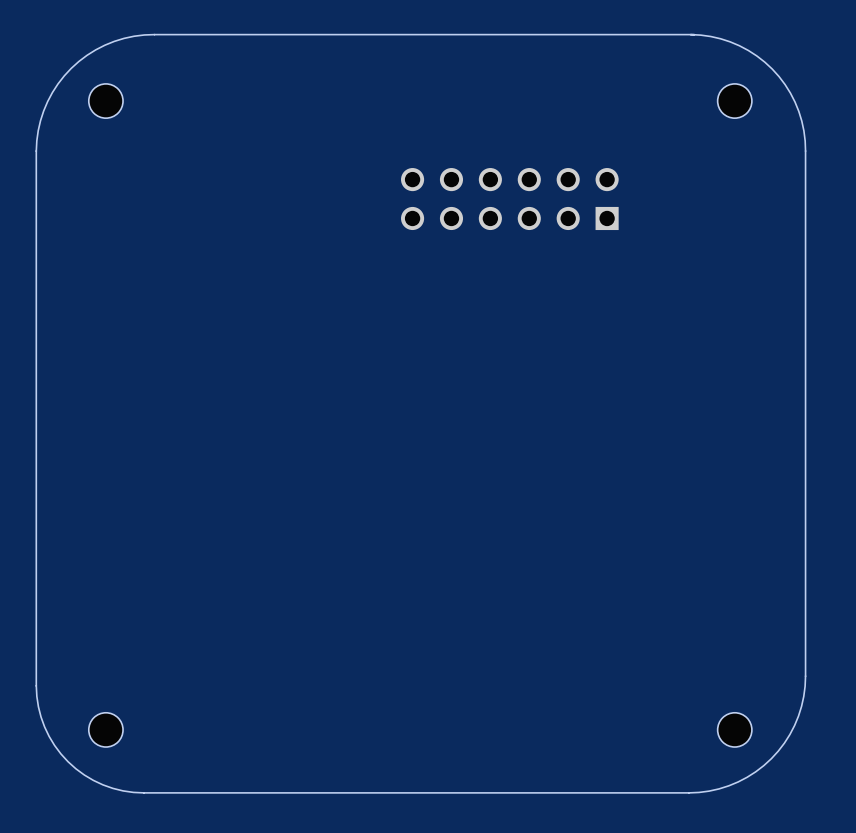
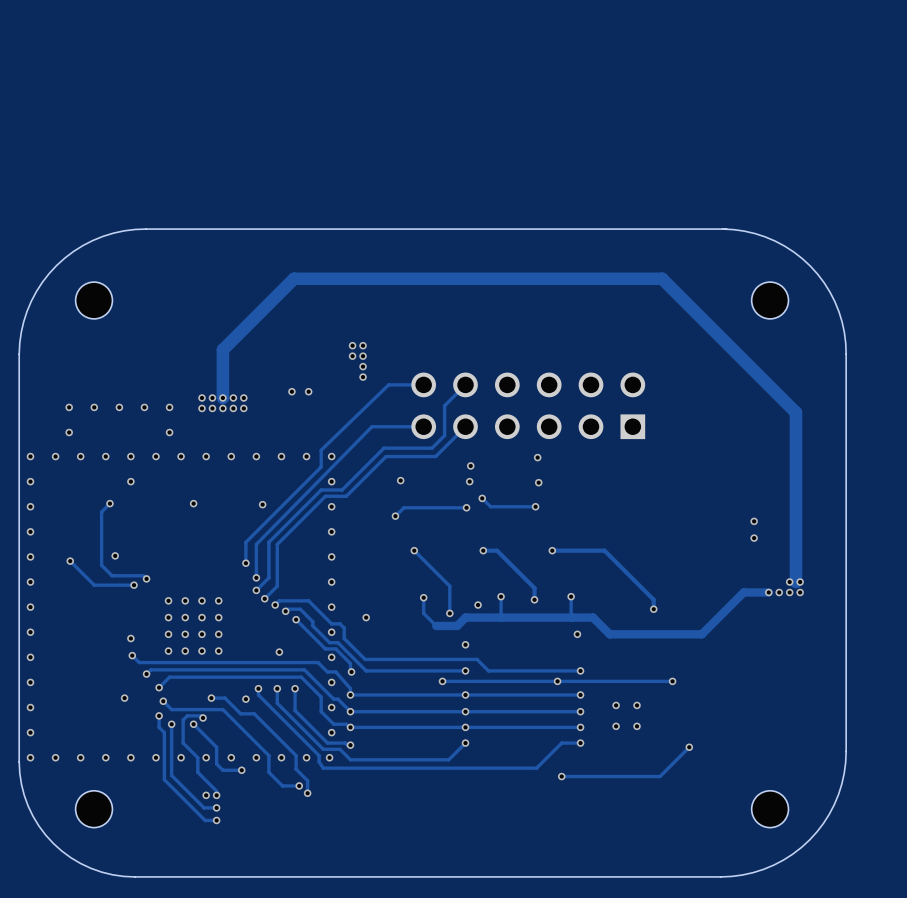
board edge: (690, 34) (720, 38) (748, 50) (772, 69) (785, 84) (795, 102) (801, 121) (805, 140) (805, 306) -> (722, 229) (754, 233) (775, 241) (793, 252) (810, 266) (824, 282) (834, 301) (844, 332) (846, 354)
board edge: (694, 34) (154, 34) (124, 38) (104, 45) (78, 61) (64, 75) (47, 101) (40, 120) (36, 151) (36, 306) -> (726, 229) (146, 229) (124, 230) (103, 236) (83, 245) (64, 257) (49, 273) (36, 291) (27, 311) (21, 332) (19, 354)
hole position: (105, 101) -> (94, 300)
hole position: (734, 101) -> (770, 300)
part position: (509, 199) -> (528, 405)
via: none -> (352, 345)
via: none -> (363, 345)
via: none -> (352, 356)
via: none -> (363, 356)
via: none -> (363, 366)
via: none -> (363, 377)
track: none -> (423, 384) (388, 384) (321, 450) (321, 467) (245, 542) (245, 563)
track: none -> (465, 384) (444, 405) (444, 435) (432, 448) (383, 448) (342, 490) (321, 490) (268, 542) (268, 577) (256, 590)
via: none -> (291, 391)
via: none -> (308, 391)
via: none -> (201, 397)
via: none -> (212, 397)
track: none -> (222, 397) (222, 349) (294, 278) (662, 278) (795, 412) (795, 582)
via: none -> (222, 397)
via: none -> (233, 397)
via: none -> (243, 397)
via: none -> (69, 407)
via: none -> (94, 407)
via: none -> (119, 407)
via: none -> (144, 407)
via: none -> (169, 407)
via: none -> (201, 408)
via: none -> (212, 408)
via: none -> (222, 408)
via: none -> (233, 408)
via: none -> (243, 408)
track: none -> (423, 426) (371, 426) (256, 544) (256, 577)
track: none -> (465, 426) (435, 456) (386, 456) (346, 496) (325, 496) (277, 544) (277, 586) (264, 598)
via: none -> (69, 432)
via: none -> (169, 432)
via: none -> (30, 456)
via: none -> (55, 456)
via: none -> (80, 456)
via: none -> (105, 456)
via: none -> (130, 456)
via: none -> (155, 456)
via: none -> (181, 456)
via: none -> (206, 456)
via: none -> (231, 456)
via: none -> (256, 456)
via: none -> (281, 456)
via: none -> (306, 456)
via: none -> (331, 456)
via: none -> (537, 457)
via: none -> (470, 465)
via: none -> (400, 480)
via: none -> (30, 481)
via: none -> (130, 481)
via: none -> (331, 481)
via: none -> (469, 481)
via: none -> (538, 482)
track: none -> (482, 498) (490, 506) (535, 506)
via: none -> (482, 498)
track: none -> (109, 503) (101, 511) (101, 565) (112, 575) (143, 575) (146, 578)
via: none -> (109, 503)
via: none -> (193, 503)
via: none -> (262, 504)
via: none -> (30, 506)
via: none -> (331, 506)
via: none -> (535, 506)
track: none -> (466, 507) (403, 507) (395, 516)
via: none -> (466, 507)
via: none -> (395, 516)
via: none -> (754, 521)
via: none -> (30, 531)
via: none -> (331, 531)
via: none -> (754, 538)
track: none -> (414, 550) (449, 586) (449, 613)
via: none -> (414, 550)
track: none -> (483, 550) (497, 550) (534, 588) (534, 599)
via: none -> (483, 550)
track: none -> (552, 550) (604, 550) (653, 599) (653, 609)
via: none -> (552, 550)
via: none -> (115, 555)
via: none -> (30, 556)
via: none -> (331, 556)
track: none -> (70, 561) (94, 585) (134, 585)
via: none -> (70, 561)
via: none -> (245, 563)
via: none -> (256, 577)
via: none -> (146, 578)
via: none -> (30, 582)
via: none -> (331, 582)
via: none -> (789, 582)
via: none -> (800, 582)
via: none -> (134, 585)
via: none -> (256, 590)
track: none -> (768, 592) (743, 592) (701, 634) (609, 634) (593, 617) (465, 617) (457, 625) (436, 625) (423, 613) (423, 597)
via: none -> (768, 592)
via: none -> (779, 592)
via: none -> (789, 592)
via: none -> (800, 592)
track: none -> (501, 596) (501, 617)
via: none -> (501, 596)
track: none -> (571, 596) (572, 617)
via: none -> (571, 596)
via: none -> (423, 597)
via: none -> (264, 598)
via: none -> (534, 599)
via: none -> (168, 600)
via: none -> (185, 600)
via: none -> (201, 600)
via: none -> (218, 600)
track: none -> (275, 605) (279, 600) (308, 600) (331, 623) (340, 623) (344, 628) (344, 638) (365, 659) (477, 659) (488, 670) (580, 670)
via: none -> (275, 605)
via: none -> (478, 605)
via: none -> (30, 607)
via: none -> (331, 607)
via: none -> (653, 609)
track: none -> (285, 611) (287, 609) (300, 609) (312, 621) (312, 625) (329, 642) (337, 642) (366, 670) (465, 670)
via: none -> (285, 611)
via: none -> (449, 613)
via: none -> (168, 617)
via: none -> (185, 617)
via: none -> (201, 617)
via: none -> (218, 617)
via: none -> (366, 617)
track: none -> (296, 619) (325, 648) (335, 648) (350, 663) (351, 671)
via: none -> (296, 619)
via: none -> (30, 632)
via: none -> (331, 632)
via: none -> (168, 634)
via: none -> (185, 634)
via: none -> (201, 634)
via: none -> (218, 634)
via: none -> (577, 634)
via: none -> (130, 638)
via: none -> (465, 644)
via: none -> (168, 651)
via: none -> (185, 651)
via: none -> (201, 651)
via: none -> (218, 651)
via: none -> (279, 652)
track: none -> (132, 655) (139, 662) (318, 662) (327, 671) (335, 671) (350, 688) (350, 694) (580, 694)
via: none -> (132, 655)
via: none -> (30, 657)
via: none -> (331, 657)
via: none -> (465, 670)
via: none -> (580, 670)
via: none -> (351, 671)
track: none -> (146, 674) (150, 669) (304, 669) (333, 699) (337, 699) (350, 711) (580, 711)
via: none -> (146, 674)
via: none -> (442, 681)
via: none -> (557, 681)
track: none -> (672, 681) (442, 681)
via: none -> (672, 681)
via: none -> (30, 682)
via: none -> (331, 682)
track: none -> (159, 687) (169, 677) (301, 677) (321, 697) (321, 711) (333, 724) (346, 724) (349, 727) (580, 727)
via: none -> (159, 687)
track: none -> (258, 688) (258, 694) (319, 755) (319, 761) (323, 768) (536, 768) (561, 743) (580, 743)
via: none -> (258, 688)
track: none -> (277, 688) (277, 703) (323, 749) (340, 749) (350, 759) (448, 759) (465, 743)
via: none -> (277, 688)
track: none -> (295, 688) (295, 710) (327, 743) (345, 743) (350, 745)
via: none -> (295, 688)
via: none -> (350, 694)
via: none -> (465, 694)
via: none -> (580, 694)
via: none -> (124, 698)
track: none -> (211, 698) (224, 698) (240, 713) (254, 713) (296, 755) (296, 769) (307, 780) (307, 793)
via: none -> (211, 698)
via: none -> (245, 699)
track: none -> (163, 701) (171, 709) (222, 709) (268, 755) (268, 772) (282, 785) (299, 785)
via: none -> (163, 701)
via: none -> (616, 705)
via: none -> (637, 705)
via: none -> (30, 707)
via: none -> (331, 707)
via: none -> (350, 711)
via: none -> (465, 711)
via: none -> (580, 711)
track: none -> (159, 715) (159, 727) (164, 732) (164, 779) (205, 820) (216, 820)
via: none -> (159, 715)
track: none -> (203, 717) (200, 715) (187, 715) (183, 720) (183, 743) (197, 757) (197, 772) (216, 791) (216, 795)
via: none -> (203, 717)
track: none -> (171, 724) (171, 775) (204, 807) (216, 807)
via: none -> (171, 724)
track: none -> (193, 724) (216, 747) (216, 763) (222, 770) (241, 770)
via: none -> (193, 724)
via: none -> (616, 726)
via: none -> (637, 726)
via: none -> (350, 727)
via: none -> (465, 727)
via: none -> (580, 727)
via: none -> (30, 732)
via: none -> (331, 732)
via: none -> (465, 743)
via: none -> (580, 743)
via: none -> (350, 745)
track: none -> (689, 747) (660, 776) (561, 776)
via: none -> (689, 747)
via: none -> (30, 757)
via: none -> (55, 757)
via: none -> (80, 757)
via: none -> (105, 757)
via: none -> (130, 757)
via: none -> (155, 757)
via: none -> (181, 757)
via: none -> (206, 757)
via: none -> (231, 757)
via: none -> (256, 757)
via: none -> (281, 757)
via: none -> (306, 757)
via: none -> (329, 757)
via: none -> (241, 770)
via: none -> (561, 776)
via: none -> (299, 785)
via: none -> (307, 793)
via: none -> (206, 795)
via: none -> (216, 795)
via: none -> (216, 807)
via: none -> (216, 820)

